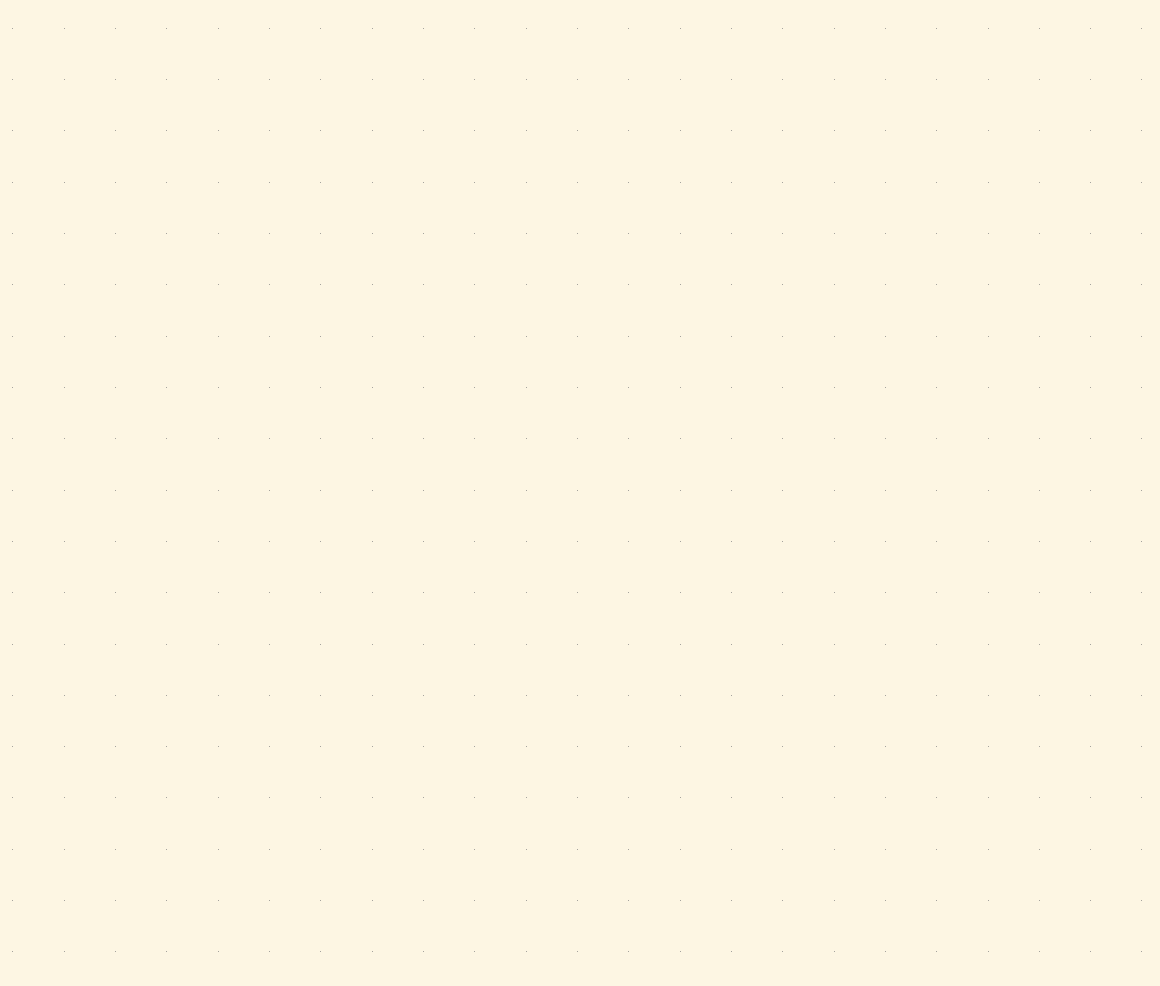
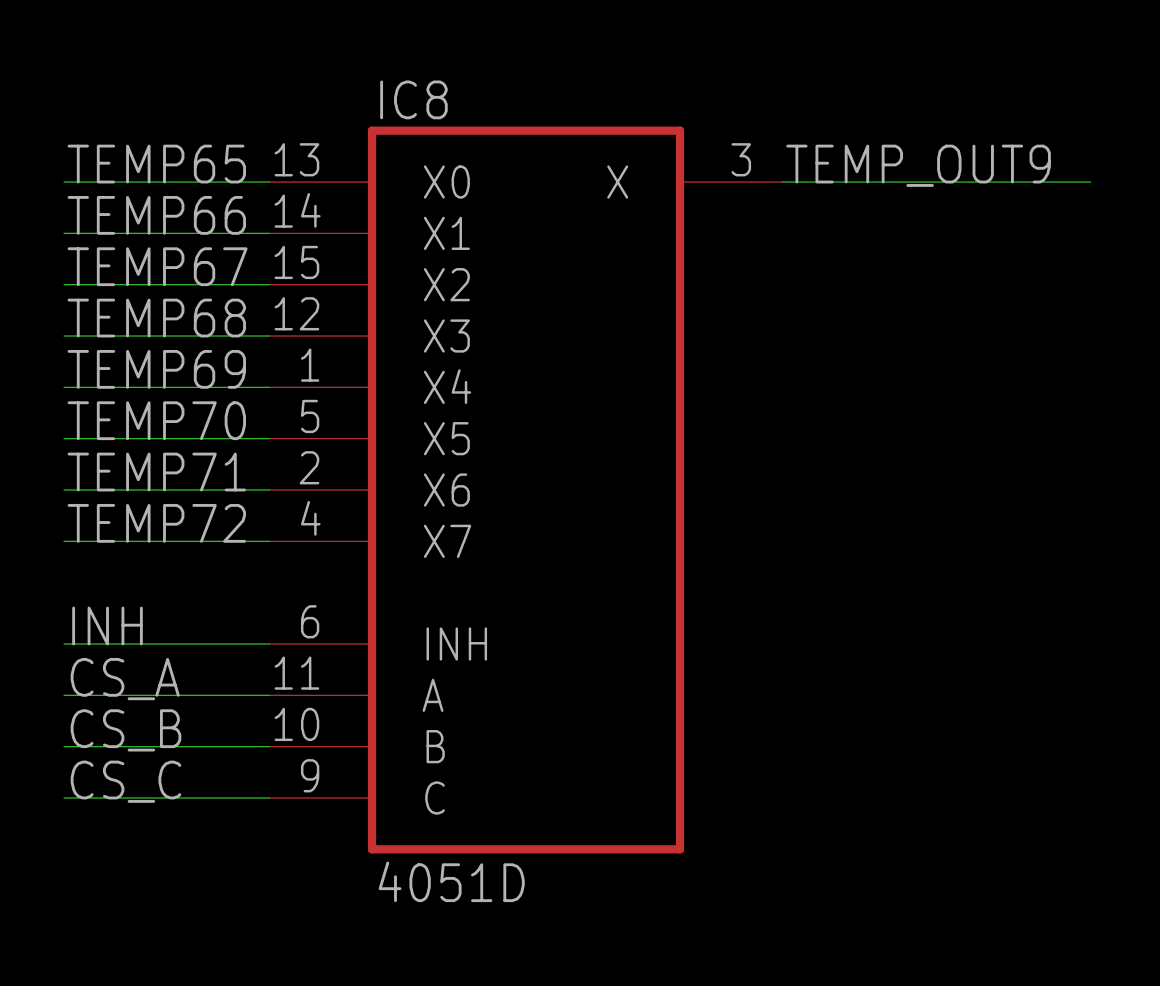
label: none -> TEMP65 (156, 164)
label: none -> TEMP_OUT9 (918, 165)
wire: none -> (64, 182) (269, 182)
wire: none -> (782, 182) (1090, 182)
label: none -> TEMP66 (156, 215)
wire: none -> (64, 233) (269, 233)
label: none -> TEMP67 (157, 266)
wire: none -> (64, 284) (269, 284)
label: none -> TEMP68 (156, 318)
wire: none -> (64, 336) (269, 336)
label: none -> TEMP69 (156, 369)
wire: none -> (64, 387) (269, 387)
label: none -> TEMP70 (156, 420)
wire: none -> (64, 438) (269, 438)
label: none -> TEMP71 (156, 472)
wire: none -> (64, 490) (269, 490)
IC8: none -> 4051D (526, 490)
label: none -> TEMP72 (156, 523)
wire: none -> (64, 541) (269, 541)
label: none -> INH (107, 626)
wire: none -> (64, 644) (269, 644)
label: none -> CS_A (125, 679)
wire: none -> (64, 695) (269, 695)
label: none -> CS_B (125, 730)
wire: none -> (64, 746) (269, 746)
label: none -> CS_C (125, 781)
wire: none -> (64, 797) (269, 797)

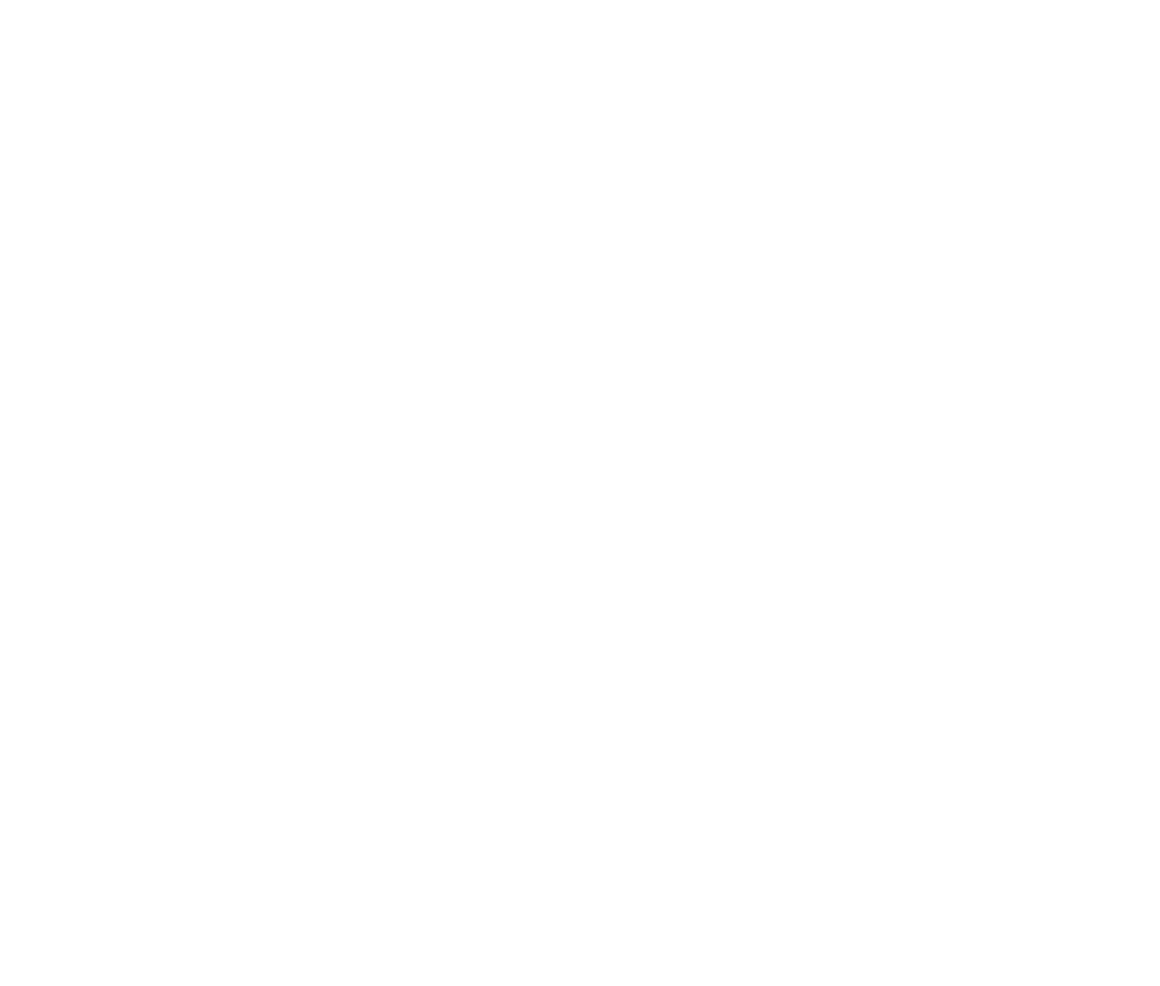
label: TEMP65 (156, 164) -> none
label: TEMP_OUT9 (918, 165) -> none
wire: (64, 182) (269, 182) -> none
wire: (782, 182) (1090, 182) -> none
label: TEMP66 (156, 215) -> none
wire: (64, 233) (269, 233) -> none
label: TEMP67 (157, 266) -> none
wire: (64, 284) (269, 284) -> none
label: TEMP68 (156, 318) -> none
wire: (64, 336) (269, 336) -> none
label: TEMP69 (156, 369) -> none
wire: (64, 387) (269, 387) -> none
label: TEMP70 (156, 420) -> none
wire: (64, 438) (269, 438) -> none
label: TEMP71 (156, 472) -> none
wire: (64, 490) (269, 490) -> none
IC8: 4051D (526, 490) -> none
label: TEMP72 (156, 523) -> none
wire: (64, 541) (269, 541) -> none
label: INH (107, 626) -> none
wire: (64, 644) (269, 644) -> none
label: CS_A (125, 679) -> none
wire: (64, 695) (269, 695) -> none
label: CS_B (125, 730) -> none
wire: (64, 746) (269, 746) -> none
label: CS_C (125, 781) -> none
wire: (64, 797) (269, 797) -> none

